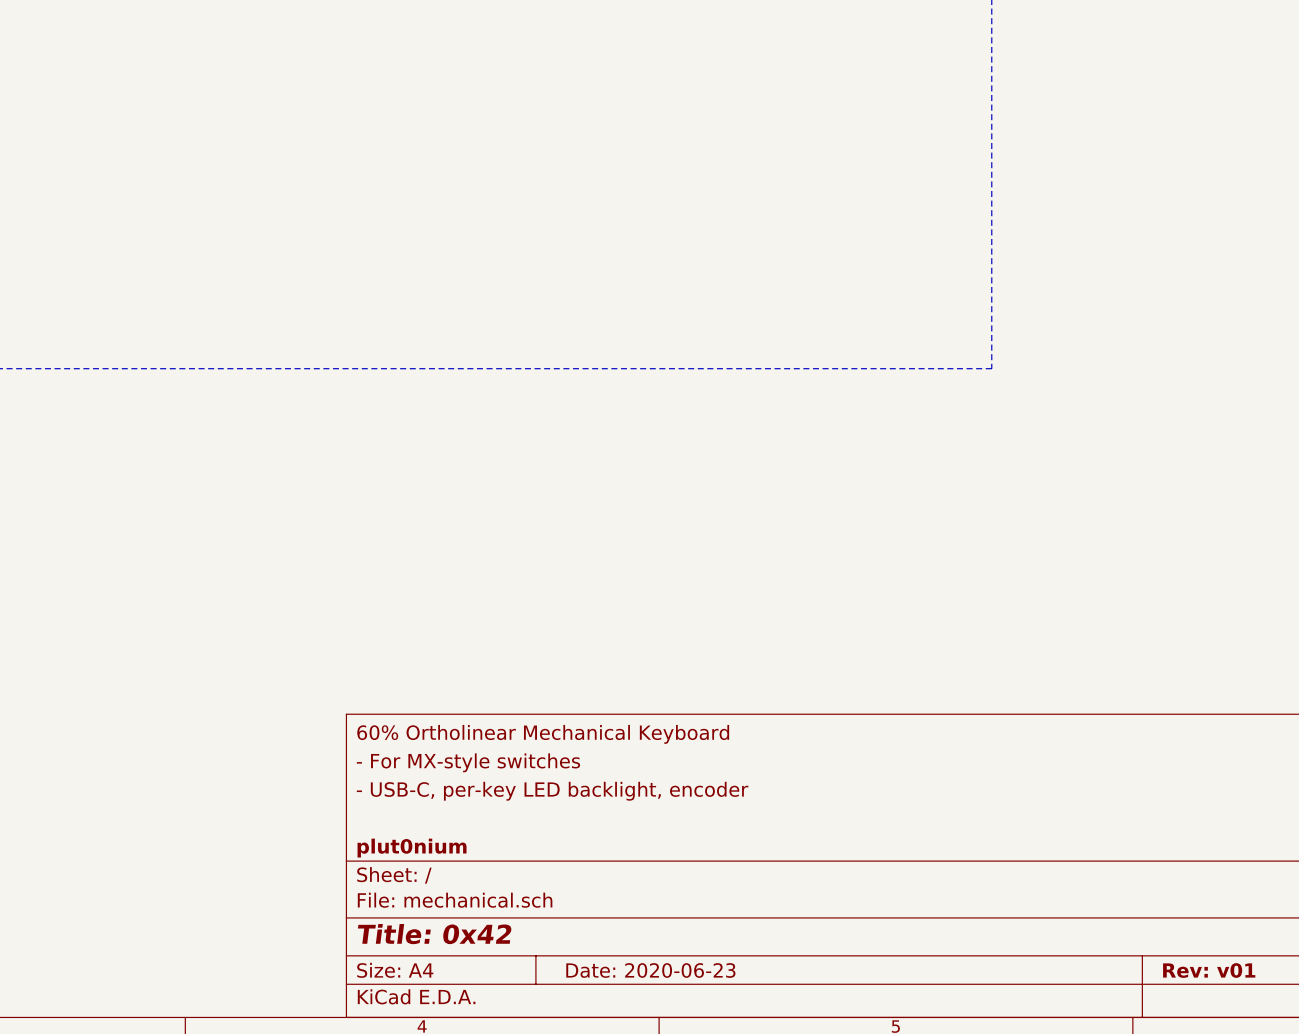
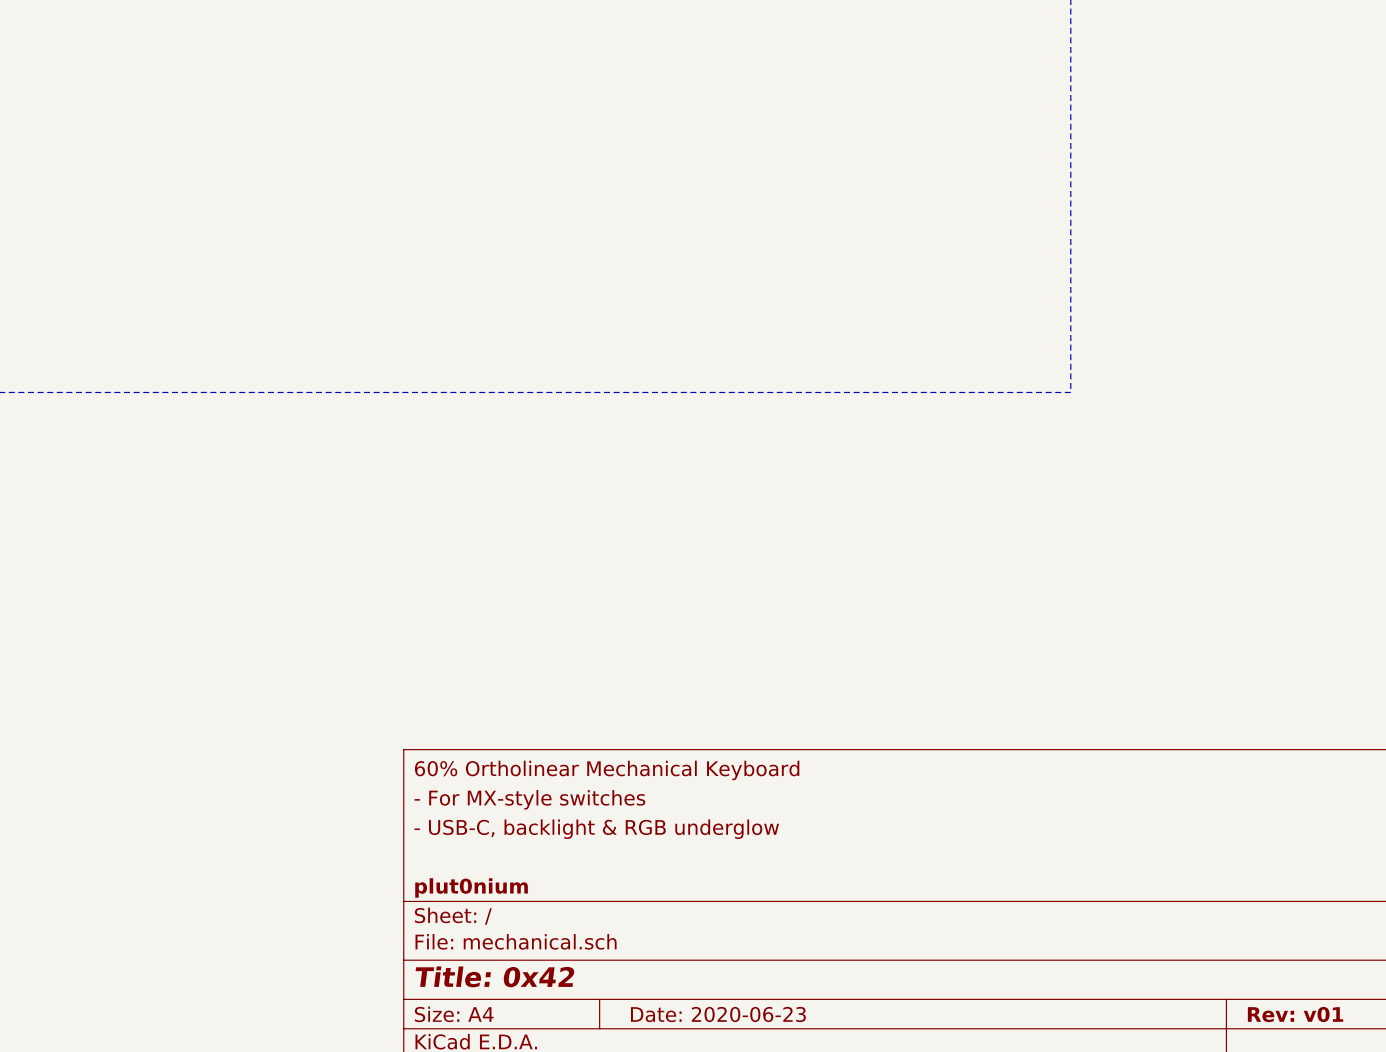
title block: - USB-C, per-key LED backlight, encoder (552, 791) -> - USB-C, backlight & RGB underglow (596, 829)

